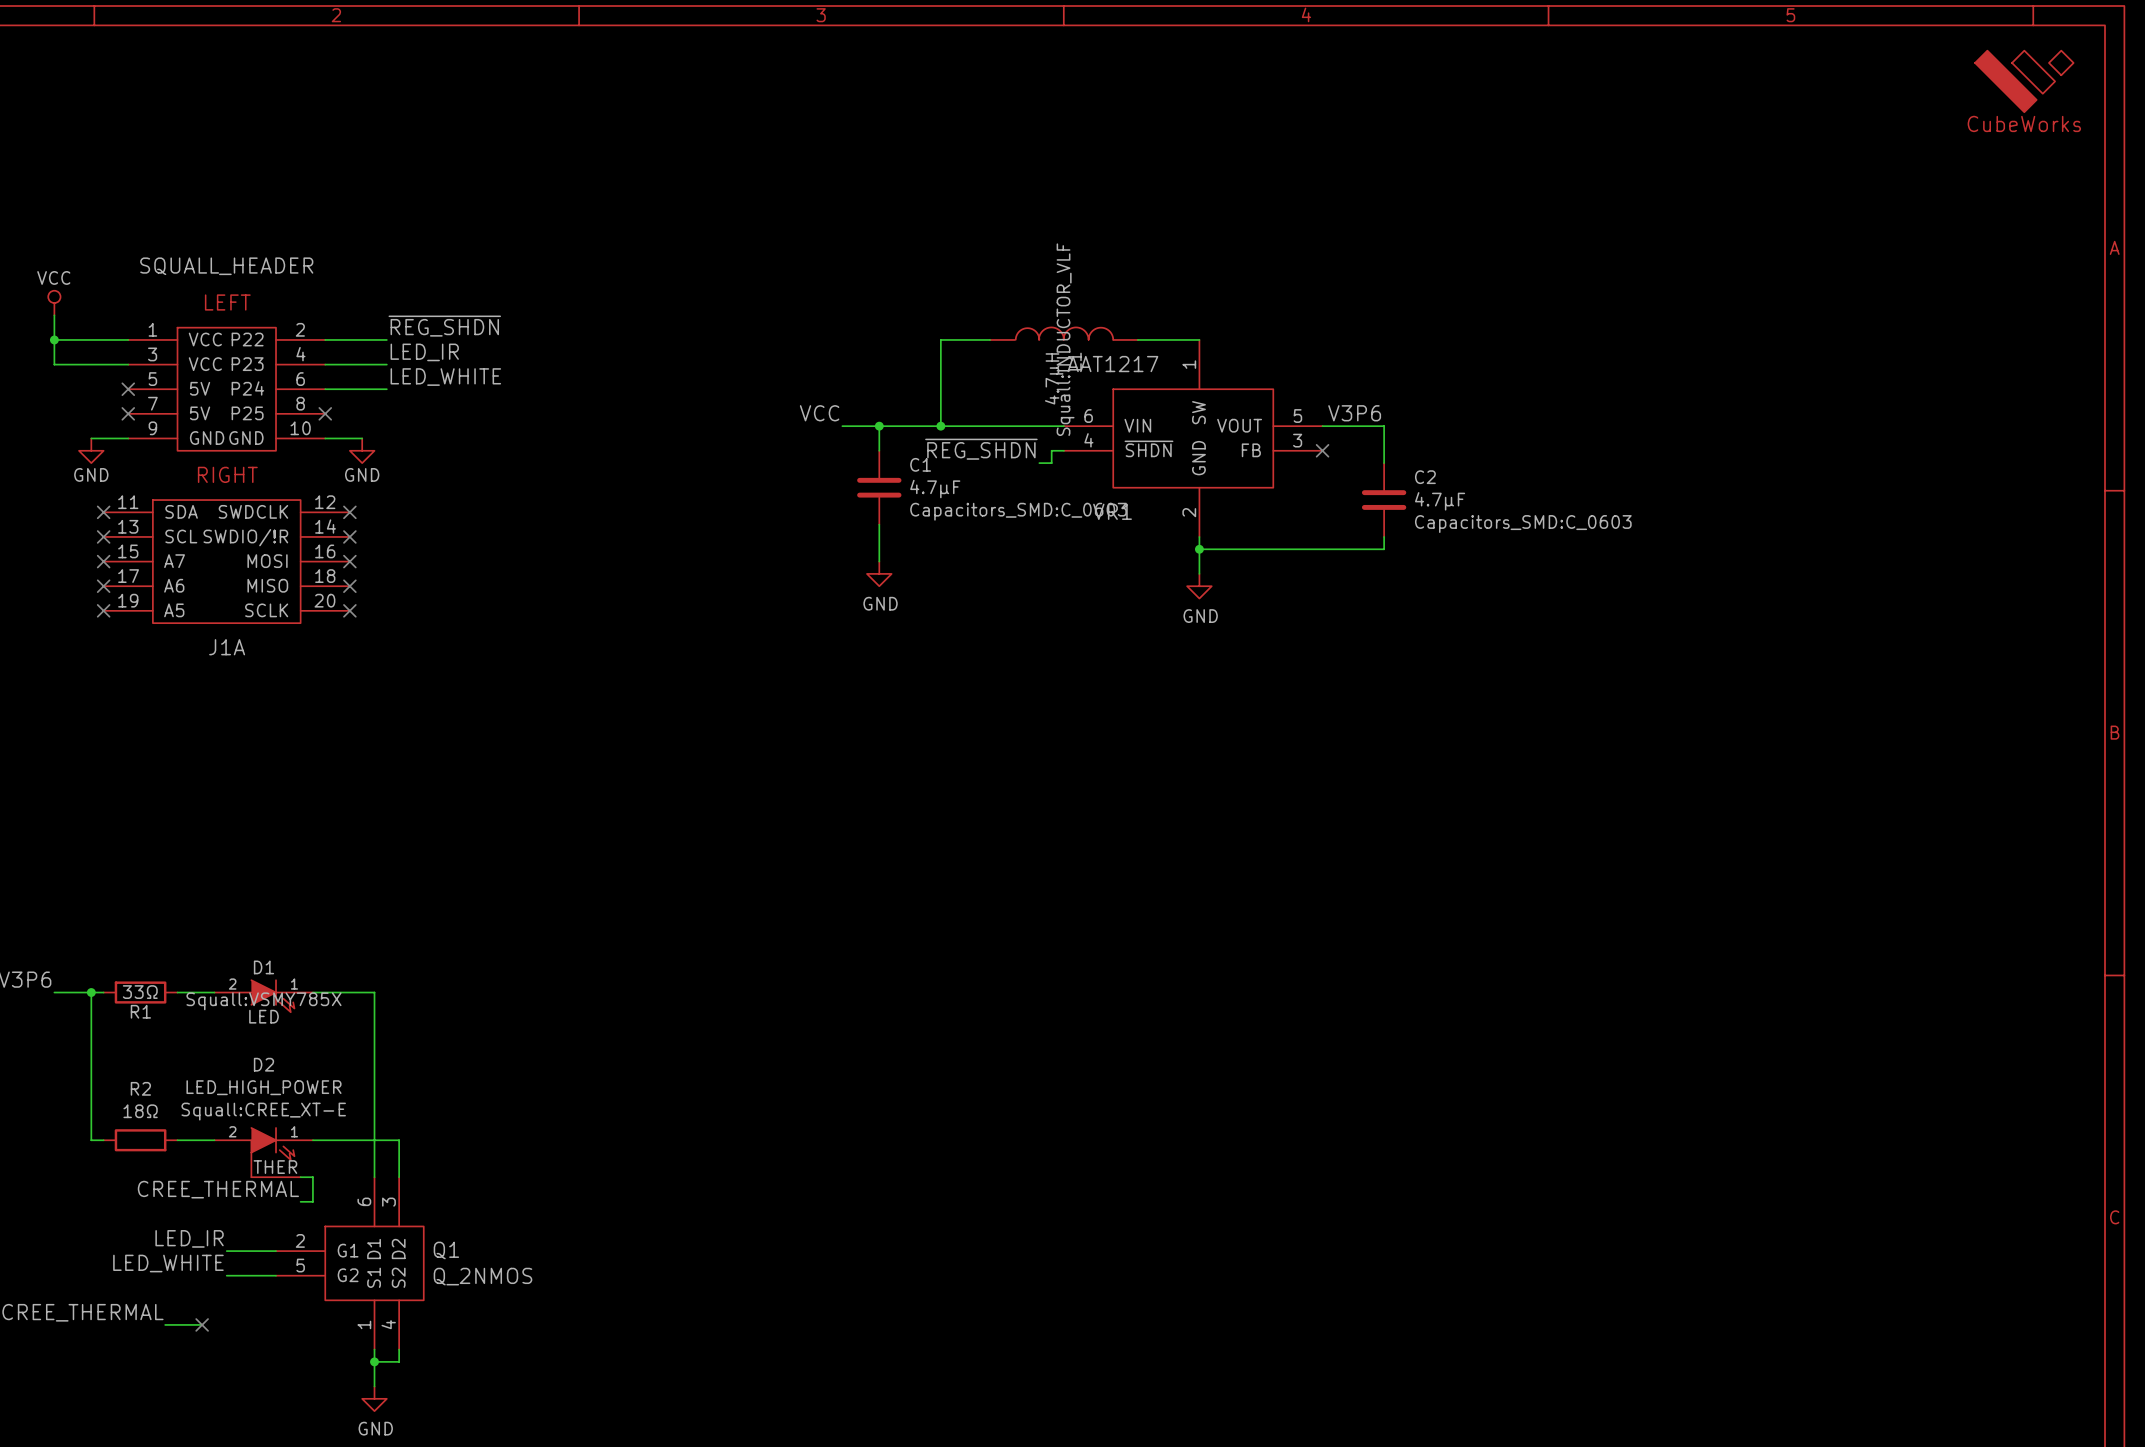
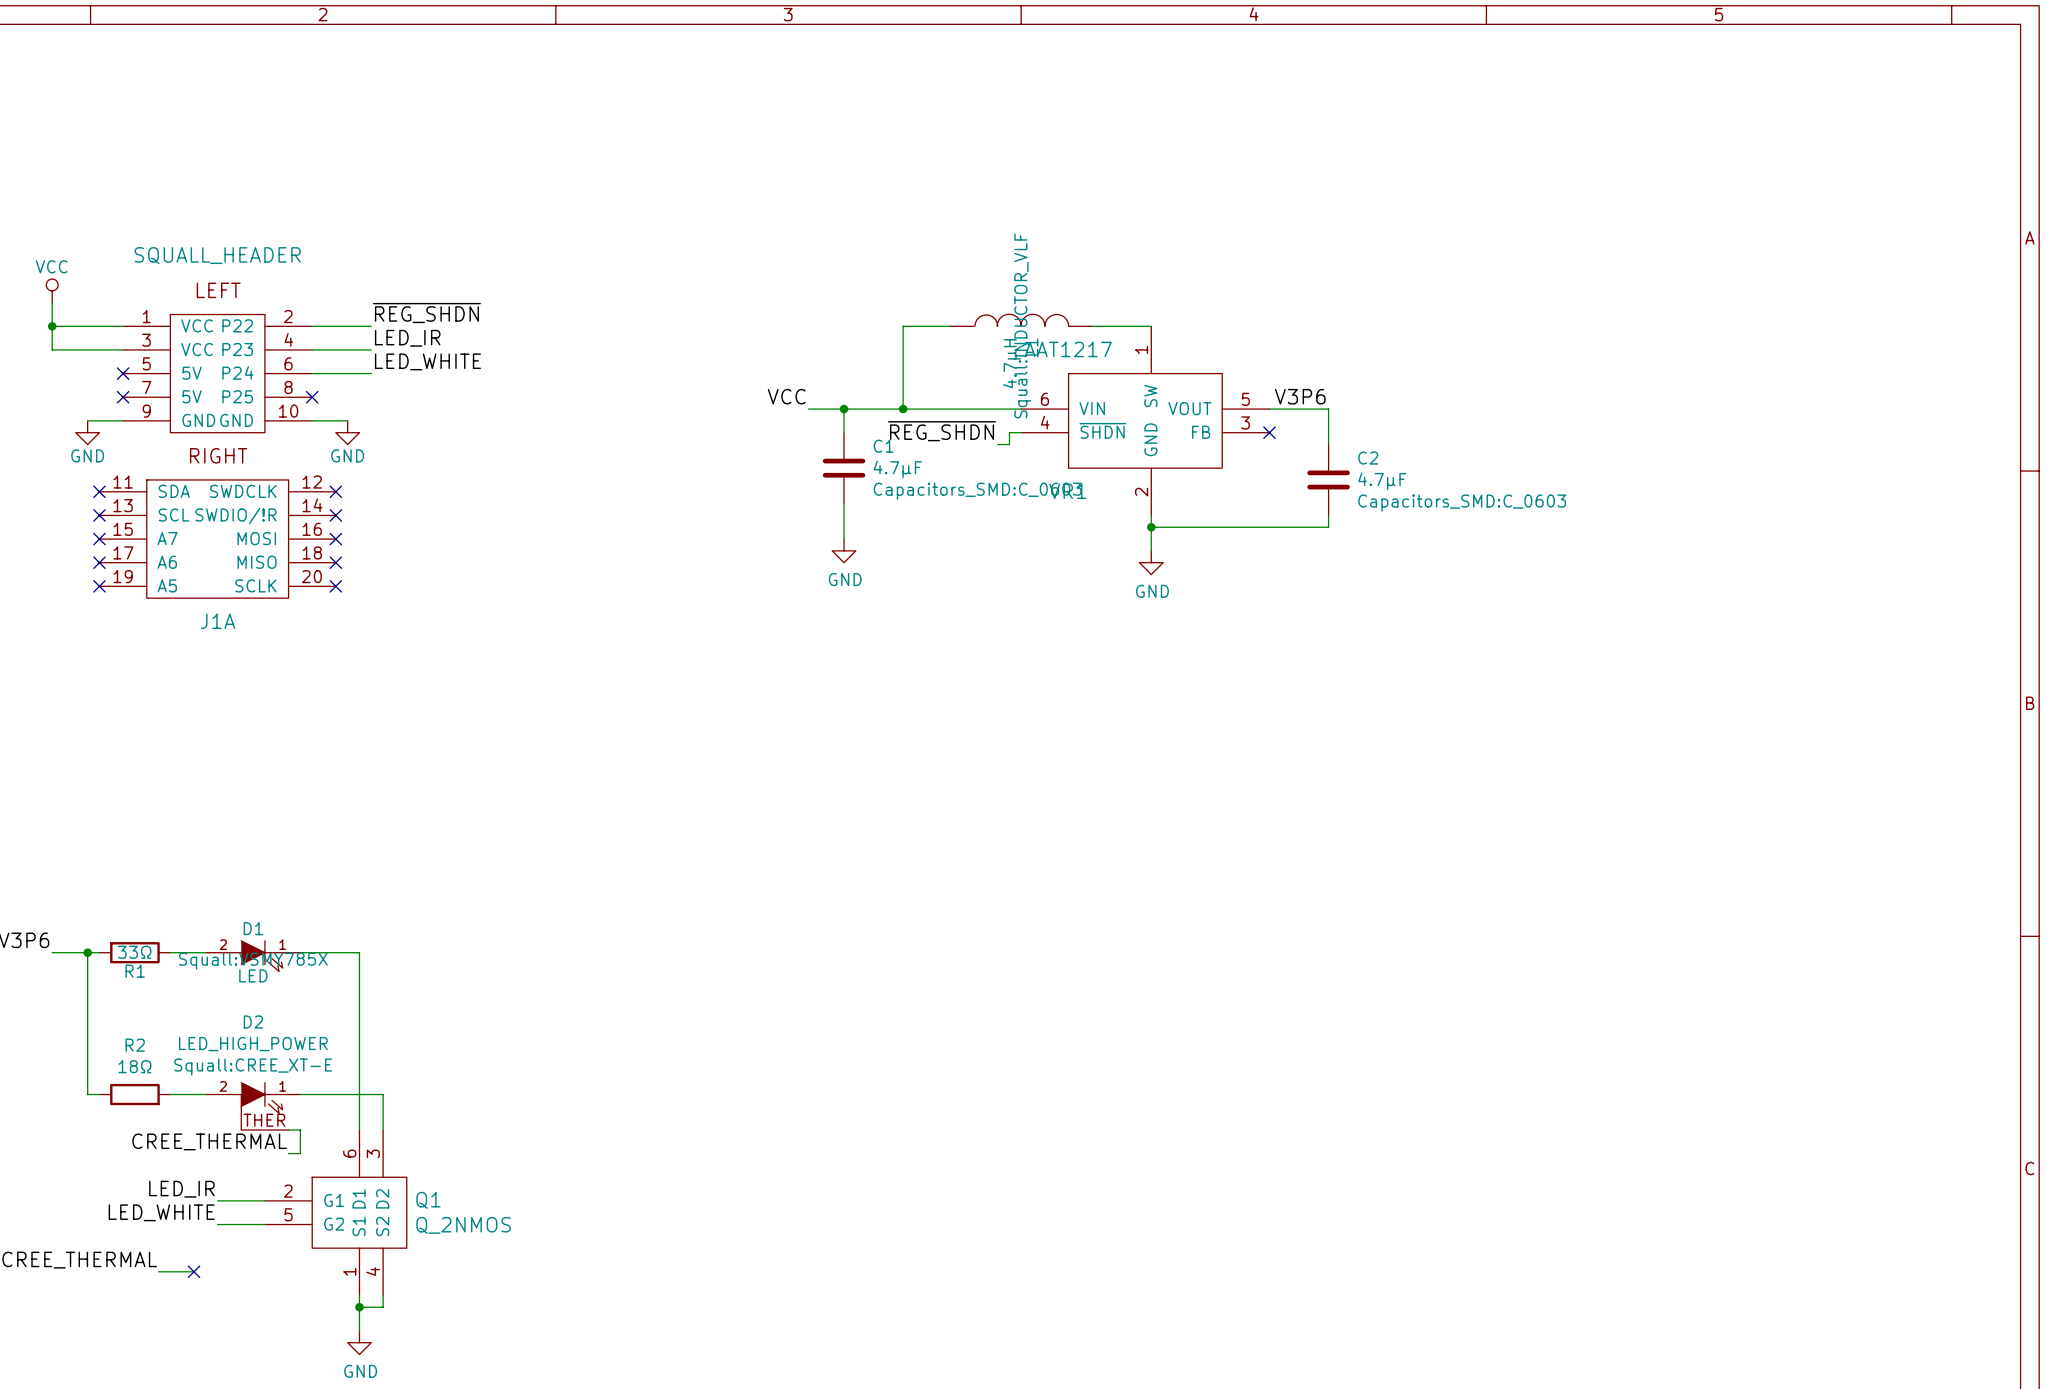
part: (2024, 81) -> none

